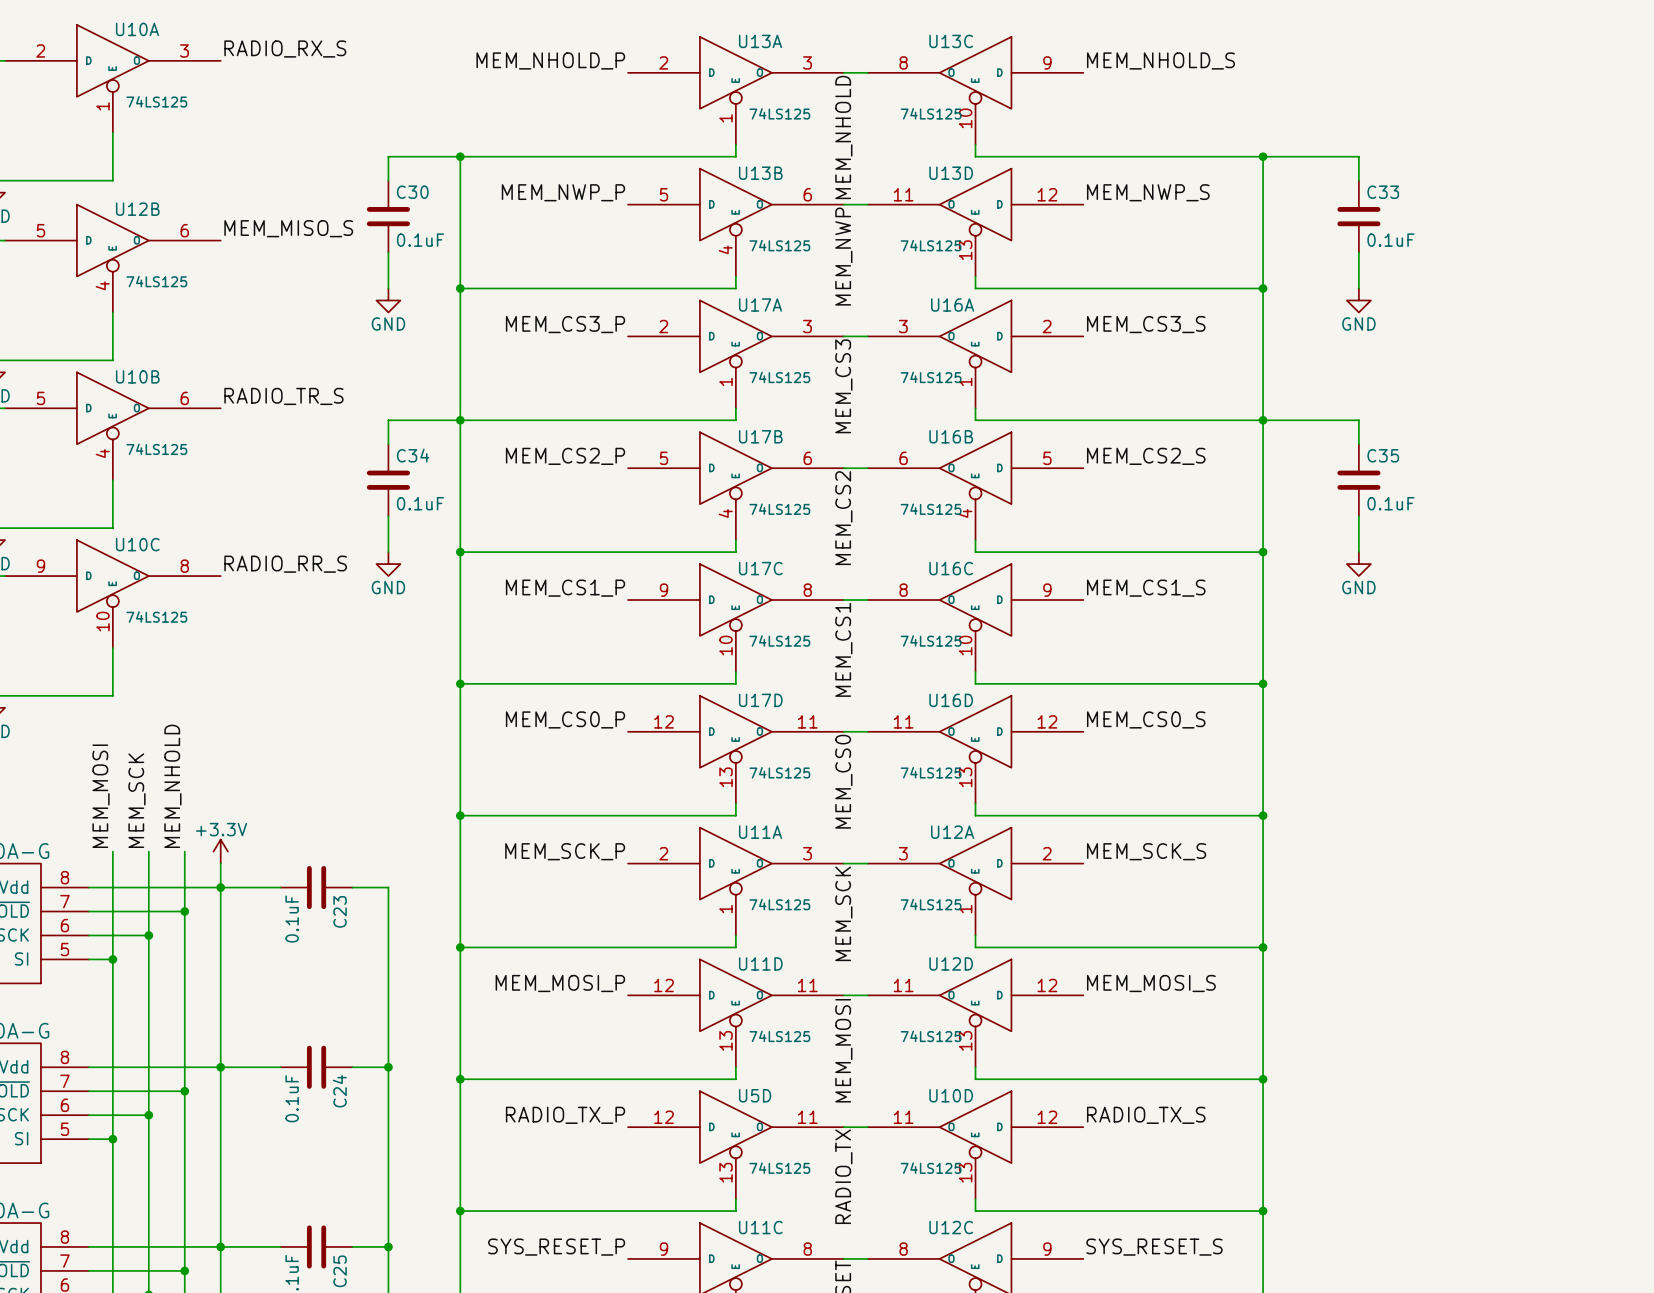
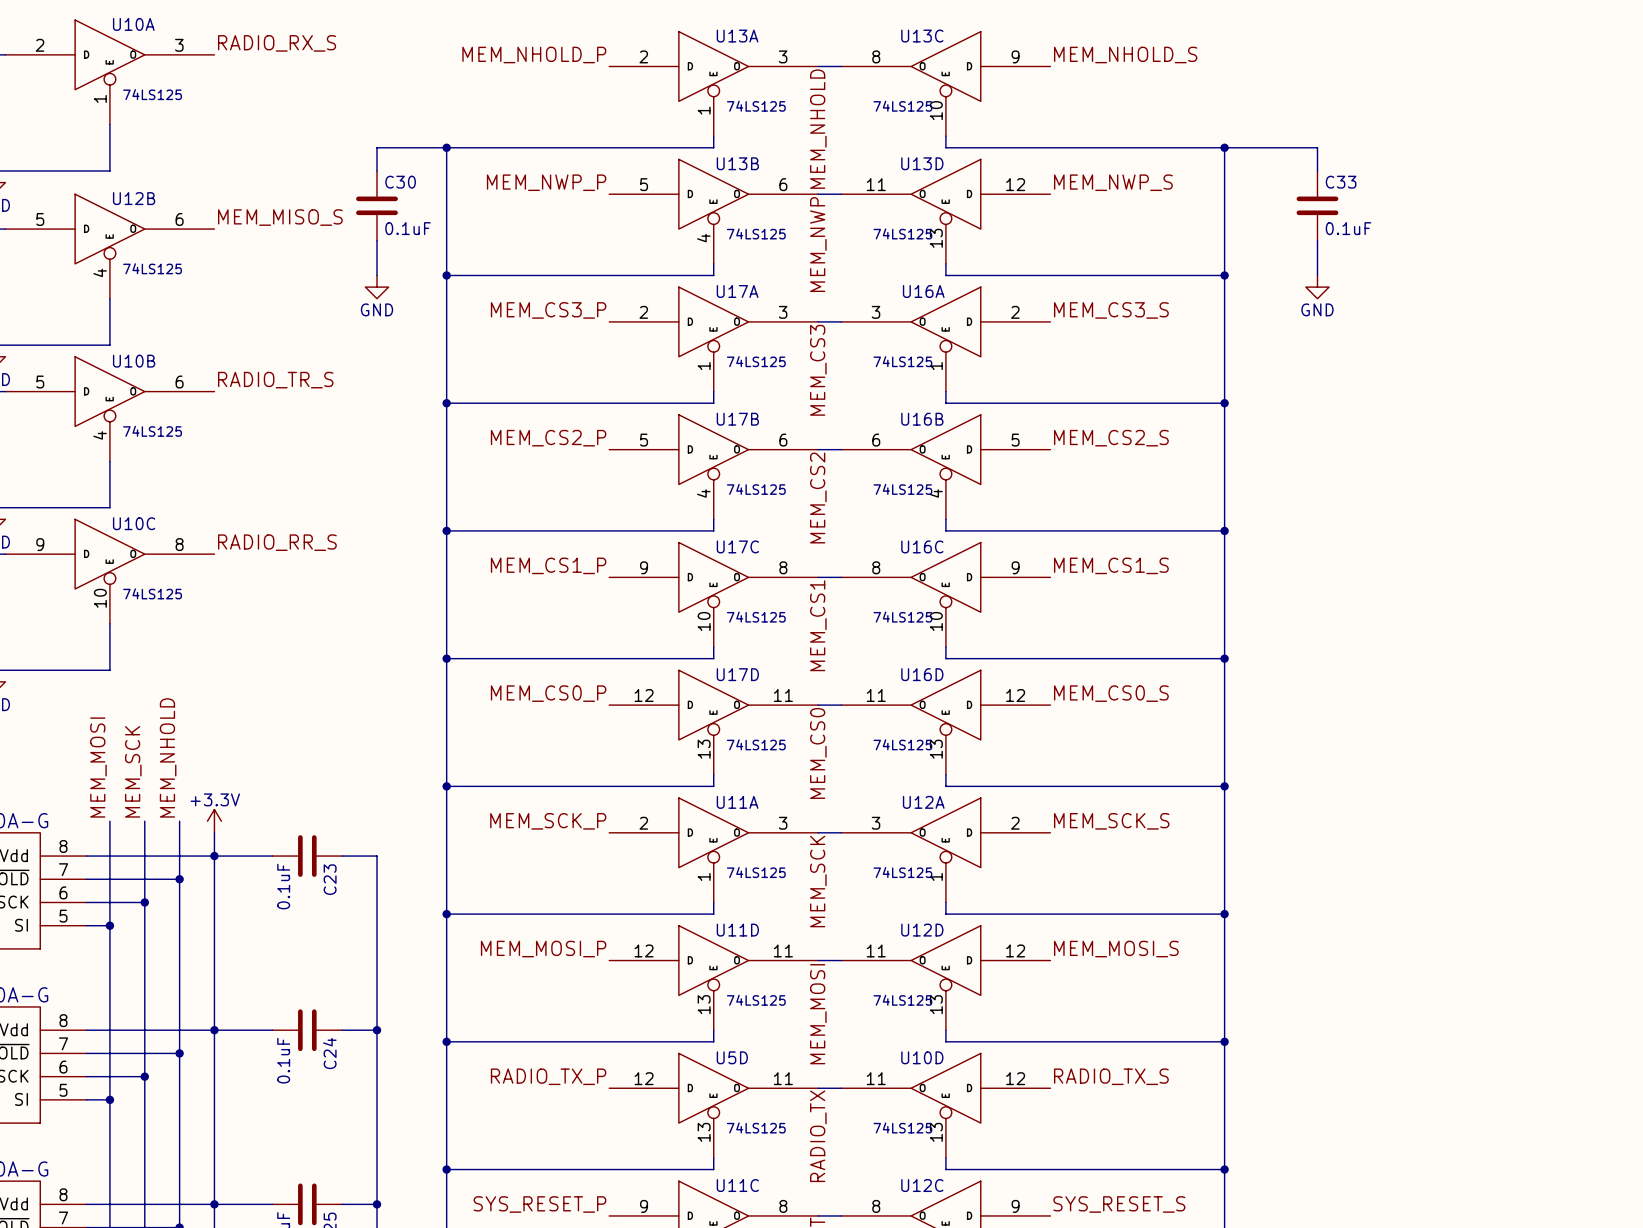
wire: (460, 420) (388, 420) (388, 444) -> none
wire: (1263, 420) (1358, 420) (1358, 444) -> none
C34: 0.1uF (388, 480) -> none
C35: 0.1uF (1358, 480) -> none
wire: (388, 516) (388, 552) -> none
wire: (1358, 516) (1358, 552) -> none
power symbol: GND (388, 564) -> none
power symbol: GND (1358, 564) -> none

